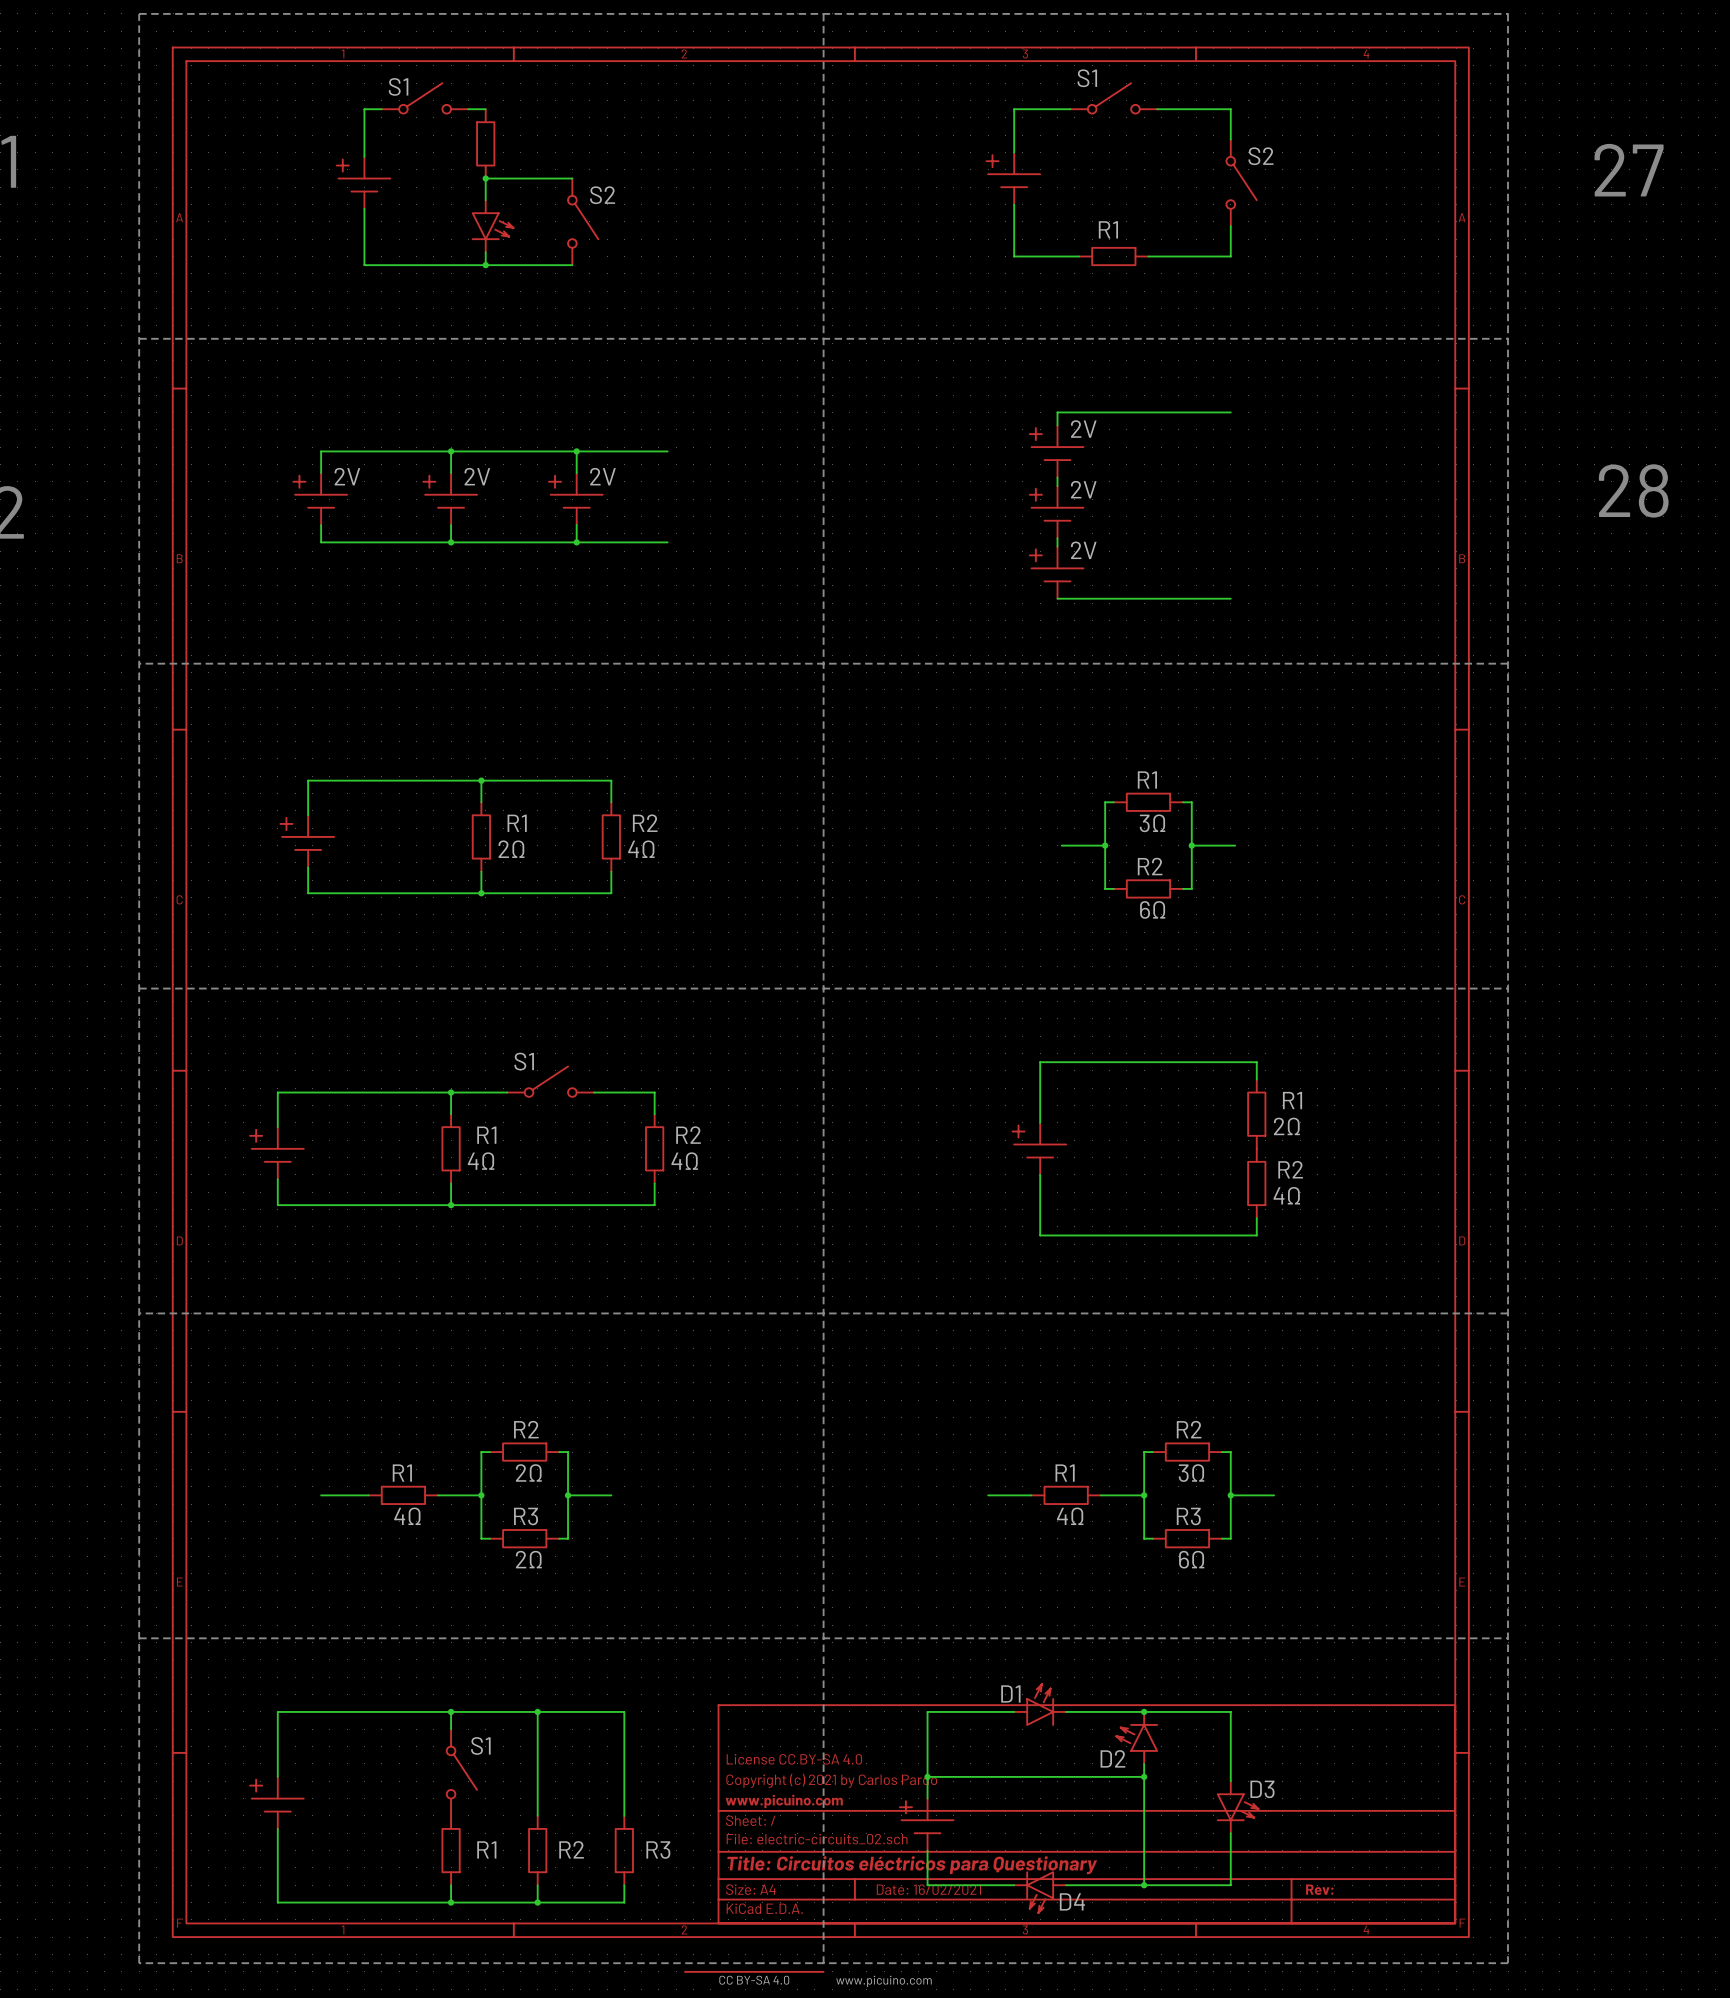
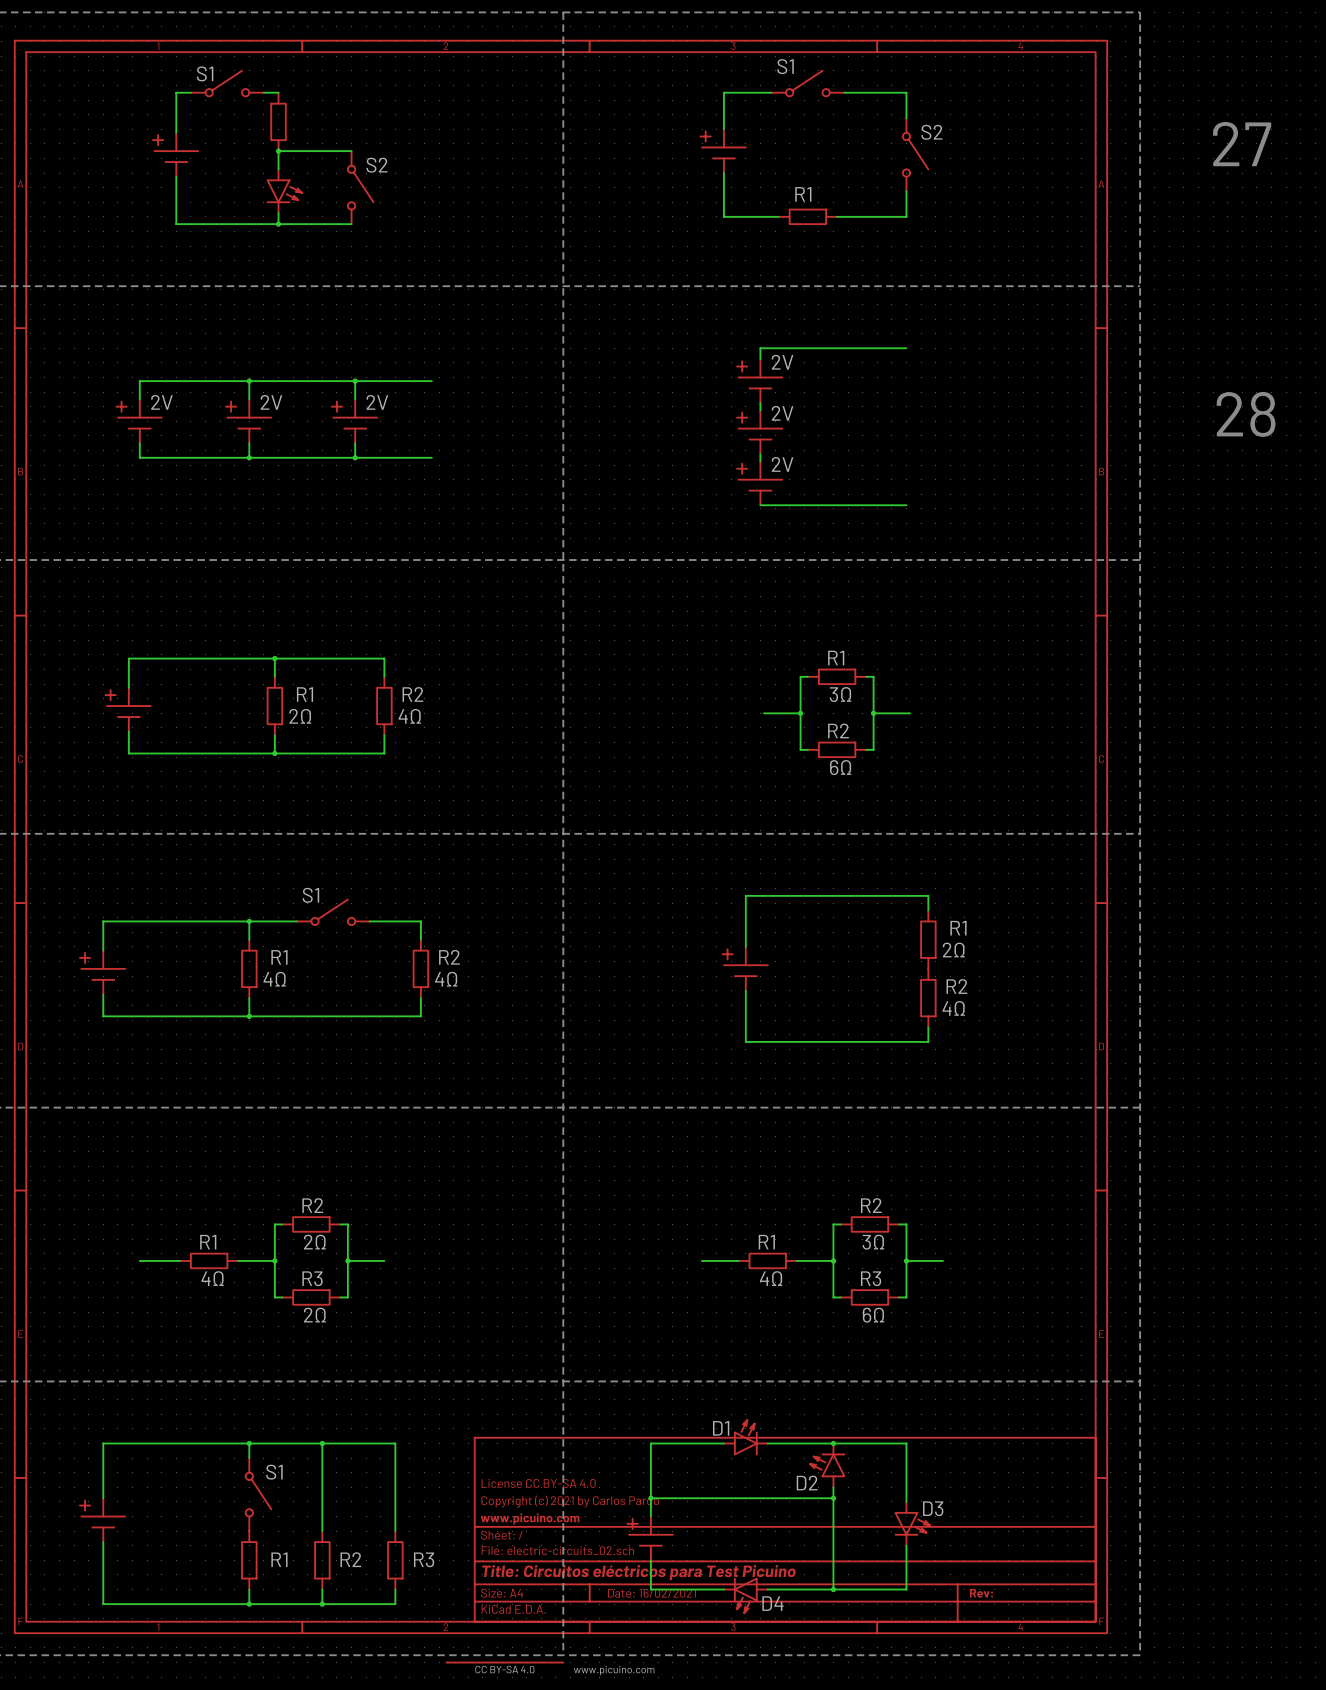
title block: Title: Circuitos eléctricos para Questionary (912, 1865) -> Title: Circuitos eléctricos para Test Picuino (638, 1572)

